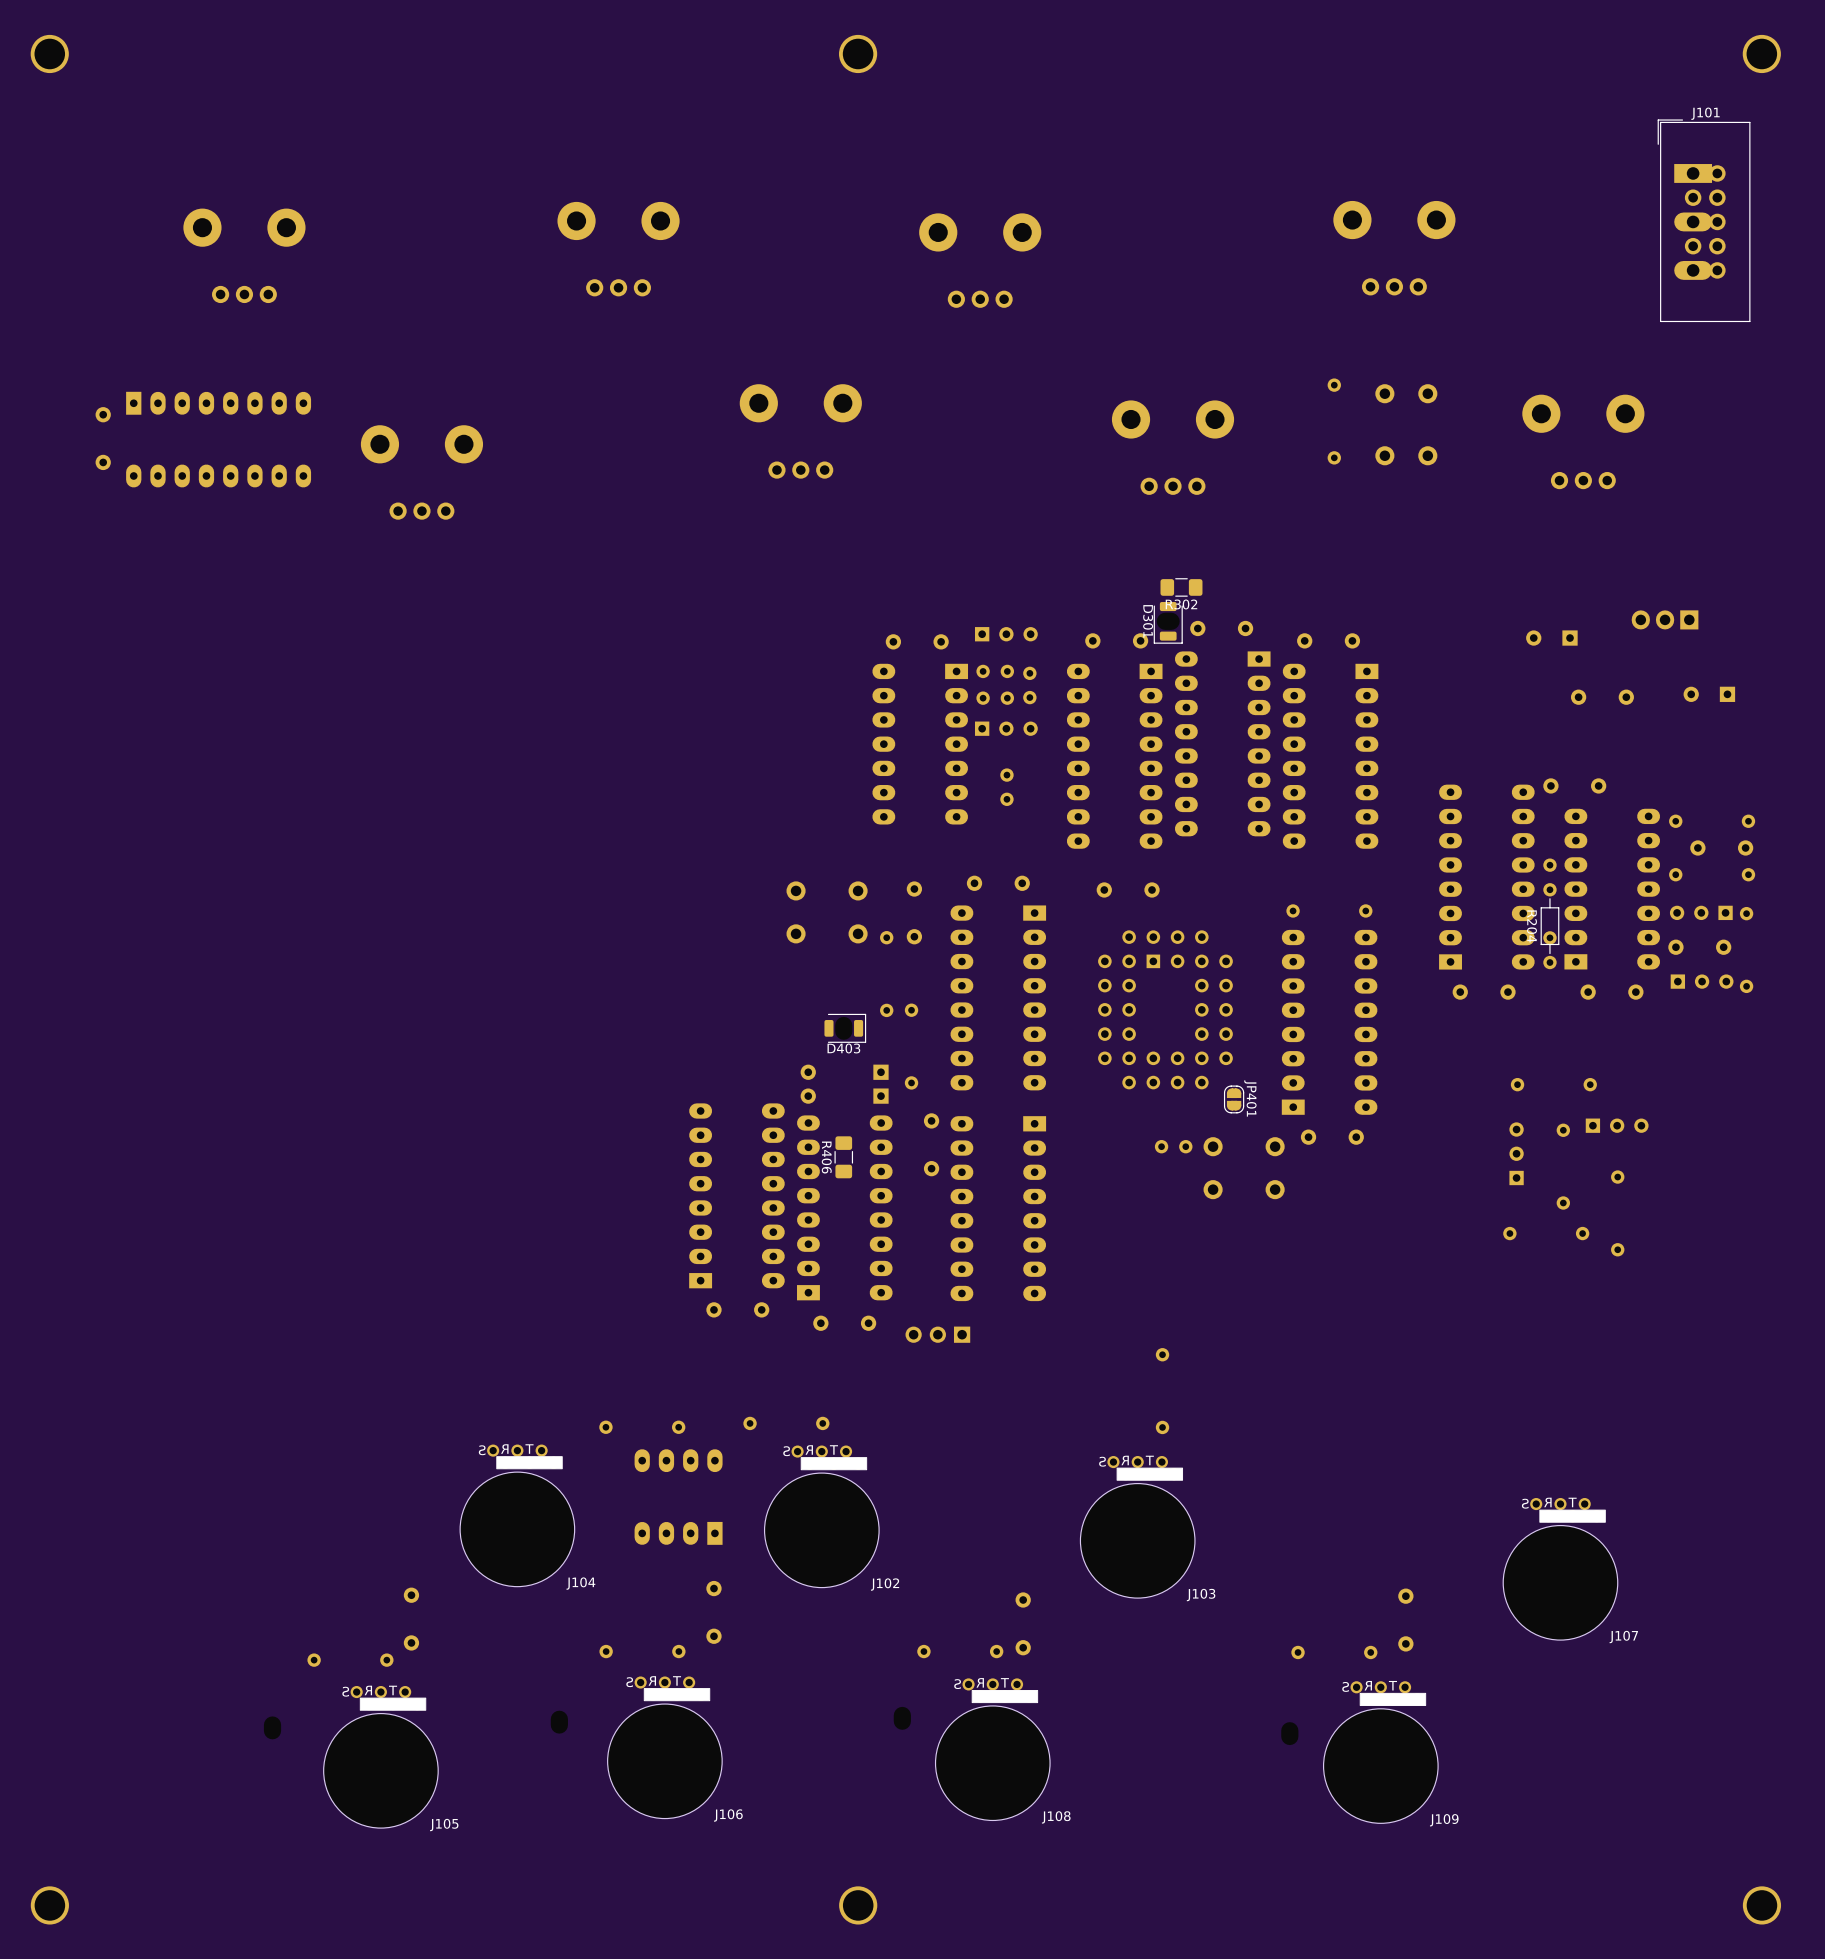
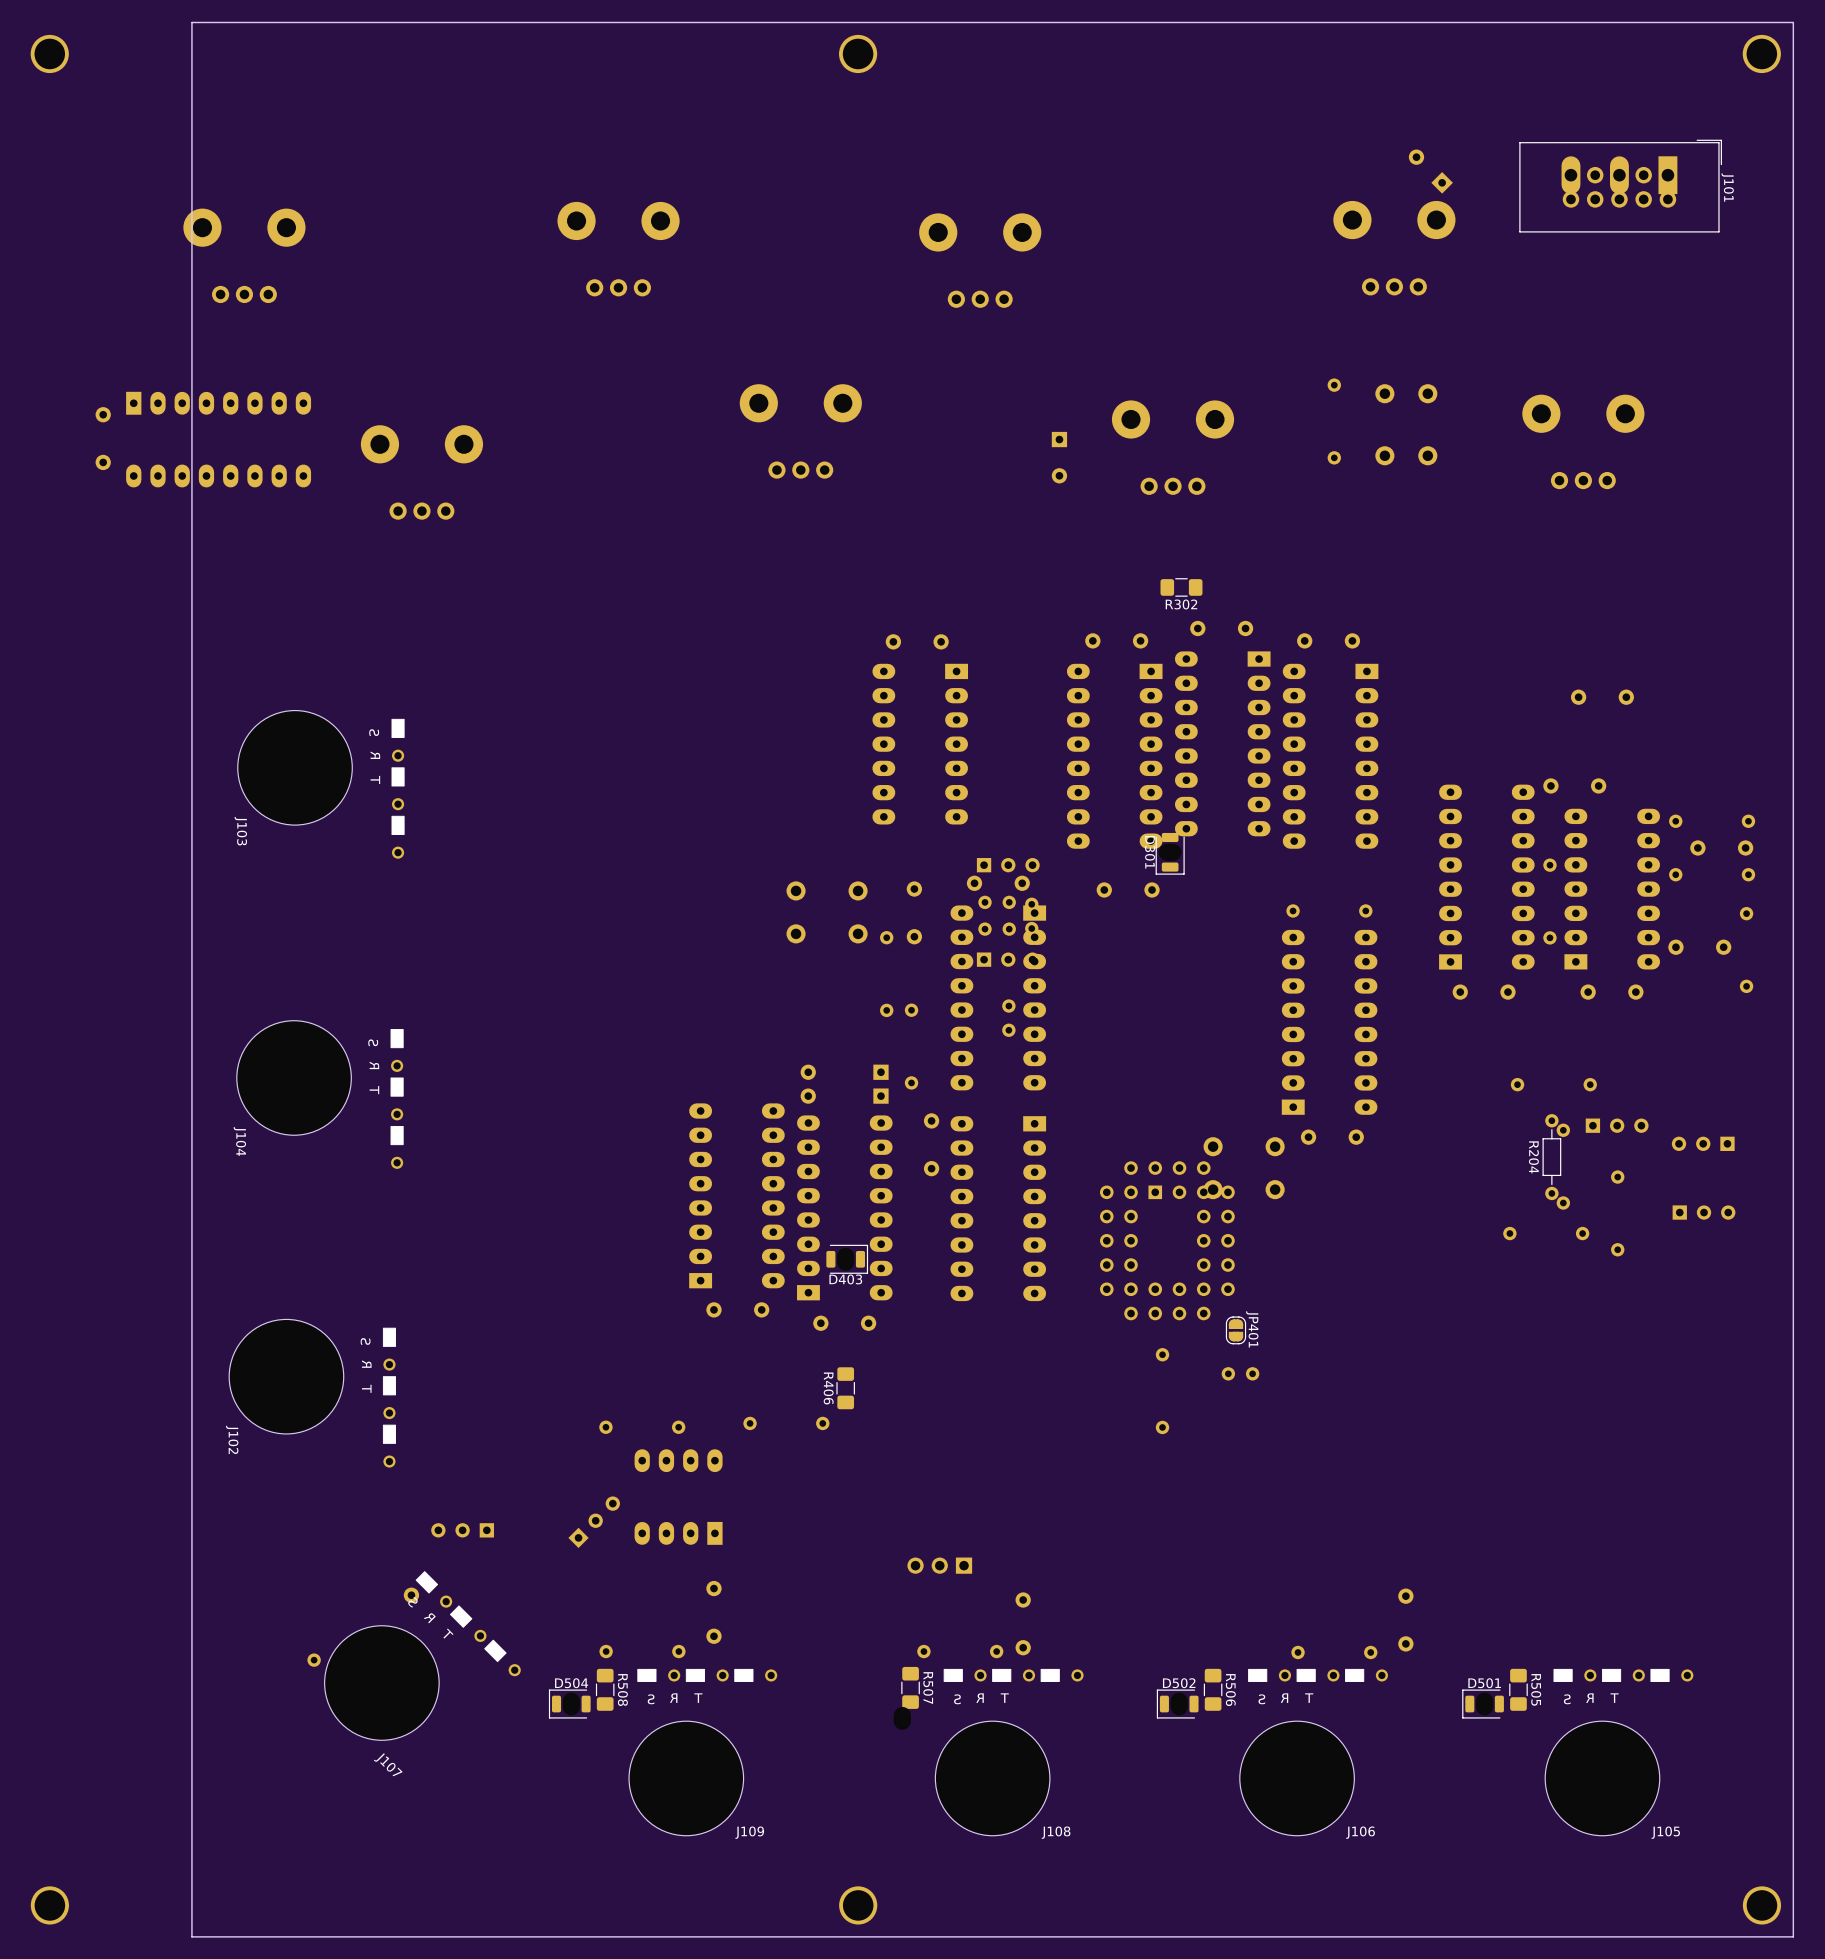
board edge: none -> (1793, 22) (191, 22) (191, 1936) (1793, 1936) (1793, 22)
part: none -> (1430, 171)
J101 rotation: 0° (1704, 220) -> 90° clockwise (1620, 186)
part: none -> (1059, 457)
part: (1665, 619) -> none
D301 position: (1168, 622) -> (1170, 853)
part: (1006, 634) -> none
part: (1551, 638) -> none
part: (995, 671) -> none
part: (1029, 685) -> none
part: (1709, 694) -> none
part: (995, 698) -> none
part: (1006, 728) -> none
part: (1006, 787) -> none
part: none -> (1008, 865)
part: none -> (997, 902)
part: (1701, 912) -> none
part: none -> (1031, 916)
R204 position: (1549, 926) -> (1551, 1157)
part: none -> (997, 929)
part: none -> (1008, 959)
part: (1702, 981) -> none
part position: (1165, 1009) -> (1167, 1240)
part: none -> (1008, 1018)
D403 position: (845, 1028) -> (847, 1259)
JP401 position: (1234, 1099) -> (1236, 1330)
part: none -> (1703, 1143)
part: (1173, 1146) -> none
part: (1516, 1153) -> none
R406 position: (843, 1157) -> (845, 1388)
part: none -> (1704, 1212)
part position: (937, 1334) -> (939, 1565)
part: none -> (1240, 1373)
J104 footprint: [460, 1444, 575, 1587] -> [236, 1020, 404, 1169]
J102 footprint: [764, 1445, 880, 1588] -> [229, 1319, 396, 1468]
J103 footprint: [1080, 1455, 1195, 1599] -> [237, 710, 405, 859]
J107 footprint: [1503, 1497, 1618, 1641] -> [324, 1571, 521, 1741]
part: none -> (594, 1522)
part: none -> (462, 1530)
J104 name position: J104 (580, 1583) -> J104 (239, 1141)
J102 name position: J102 (885, 1584) -> J102 (232, 1439)
J103 name position: J103 (1201, 1595) -> J103 (240, 831)
J107 name position: J107 (1623, 1637) -> J107 (388, 1764)
J106 footprint: [607, 1676, 723, 1819] -> [1239, 1668, 1388, 1836]
J108 footprint: [935, 1678, 1051, 1821] -> [935, 1668, 1084, 1836]
J109 footprint: [1323, 1681, 1439, 1824] -> [629, 1668, 778, 1836]
J105 footprint: [323, 1685, 439, 1829] -> [1545, 1668, 1694, 1836]
R507: none -> (910, 1687)
R508: none -> (605, 1689)
R506: none -> (1213, 1689)
R505: none -> (1518, 1689)
D504: none -> (569, 1704)
D502: none -> (1177, 1704)
D501: none -> (1483, 1704)
part: (559, 1722) -> none
part: (272, 1727) -> none
part: (1289, 1733) -> none
J106 name position: J106 (728, 1815) -> J106 (1360, 1832)
J108 name position: J108 (1056, 1817) -> J108 (1056, 1832)
J109 name position: J109 (1444, 1820) -> J109 (749, 1832)
J105 name position: J105 (444, 1825) -> J105 (1665, 1832)

